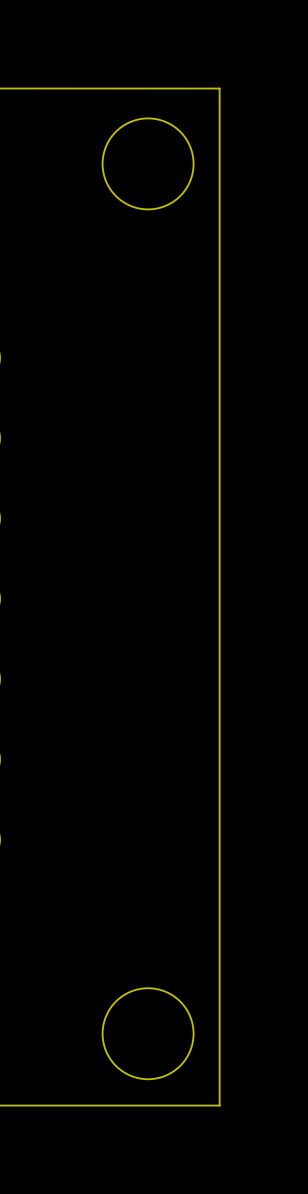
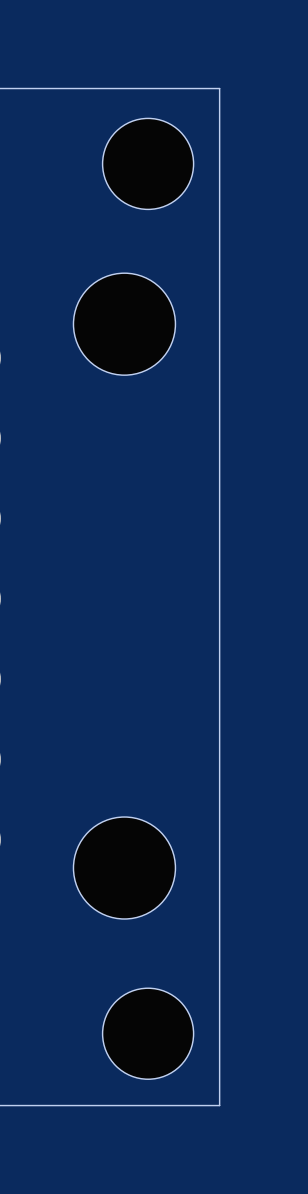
hole: none -> (124, 324)
hole: none -> (124, 868)

